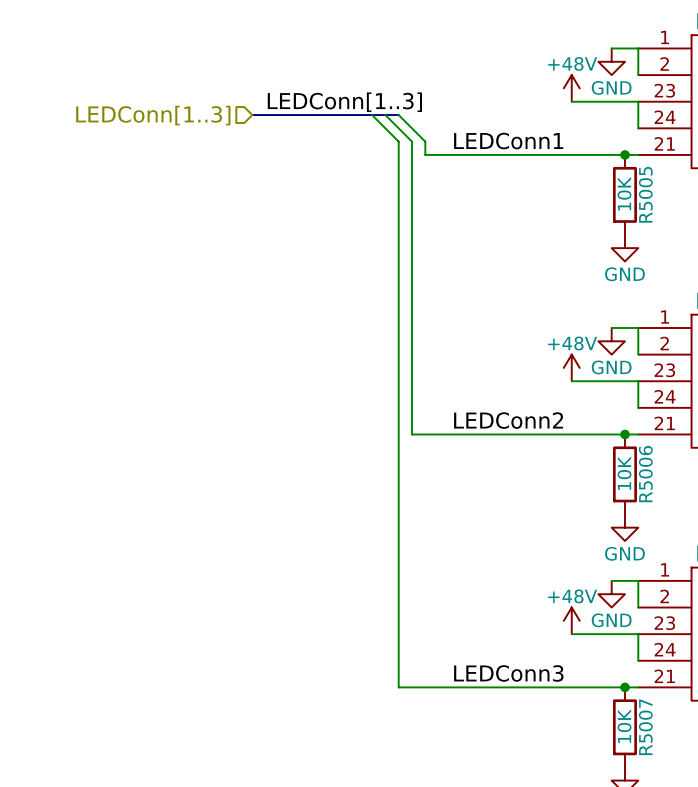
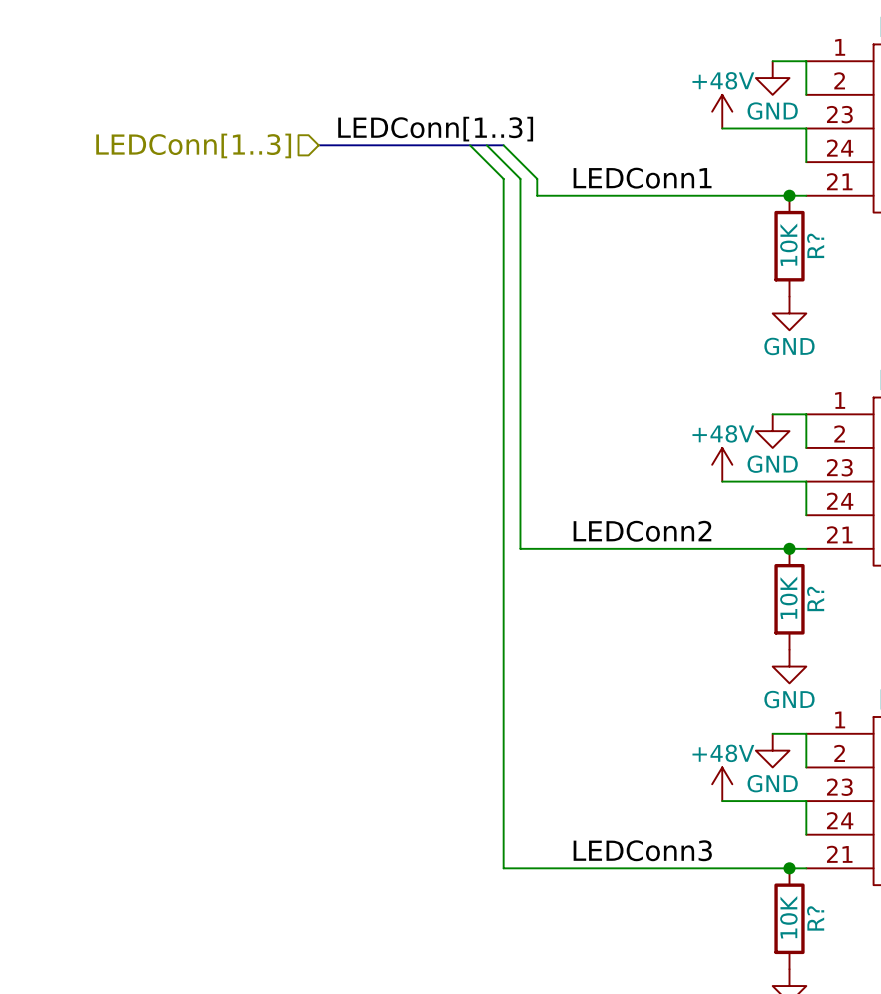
R5005 name: R5005 (645, 194) -> R? (815, 245)
R5006 name: R5006 (645, 474) -> R? (815, 598)
R5007 name: R5007 (645, 727) -> R? (815, 918)

